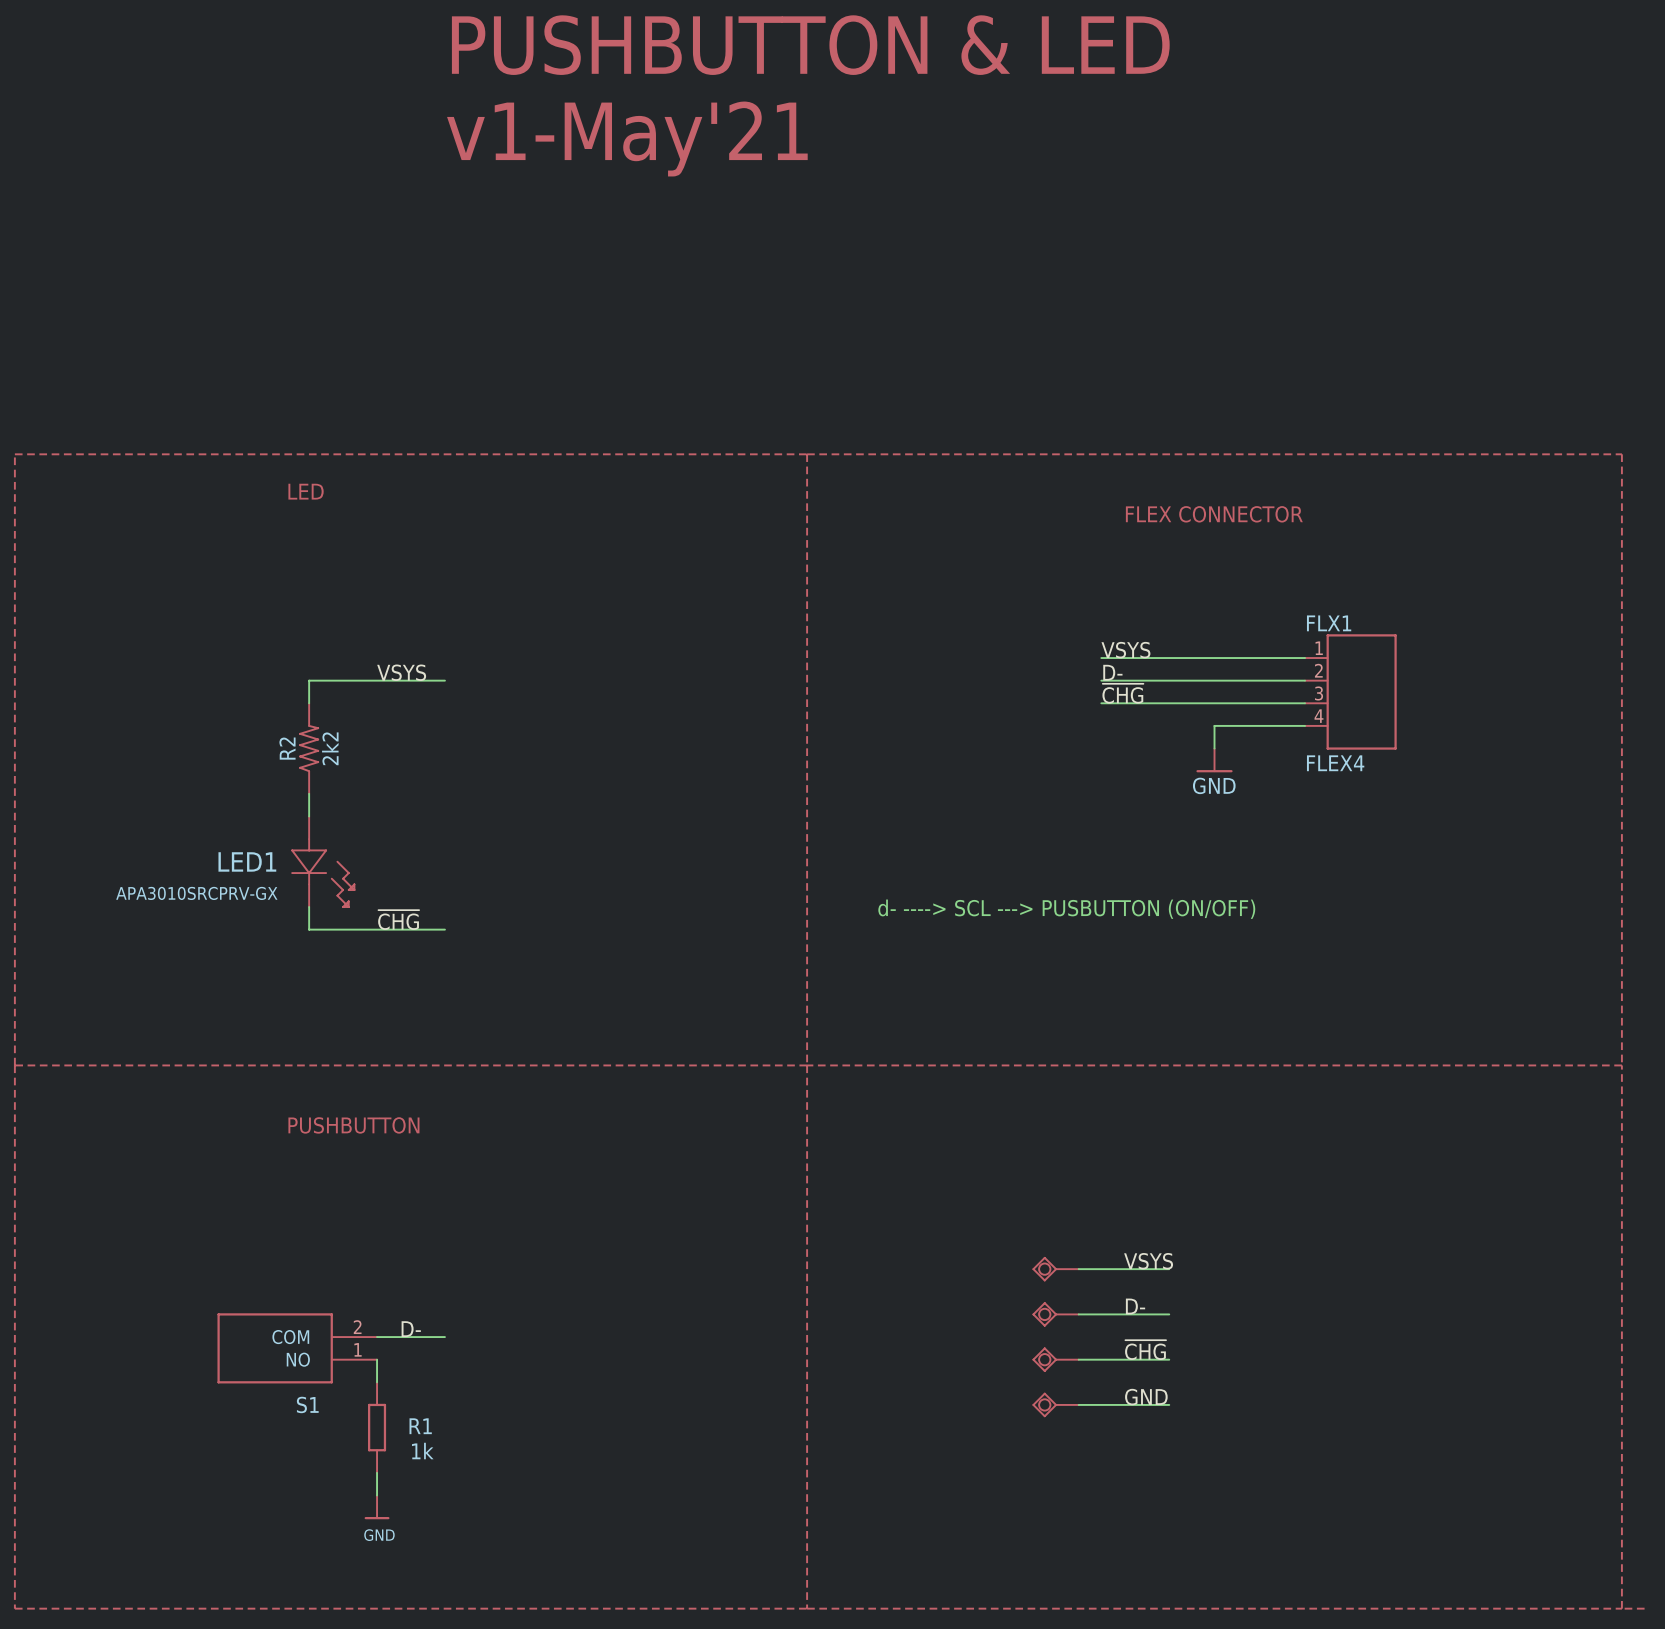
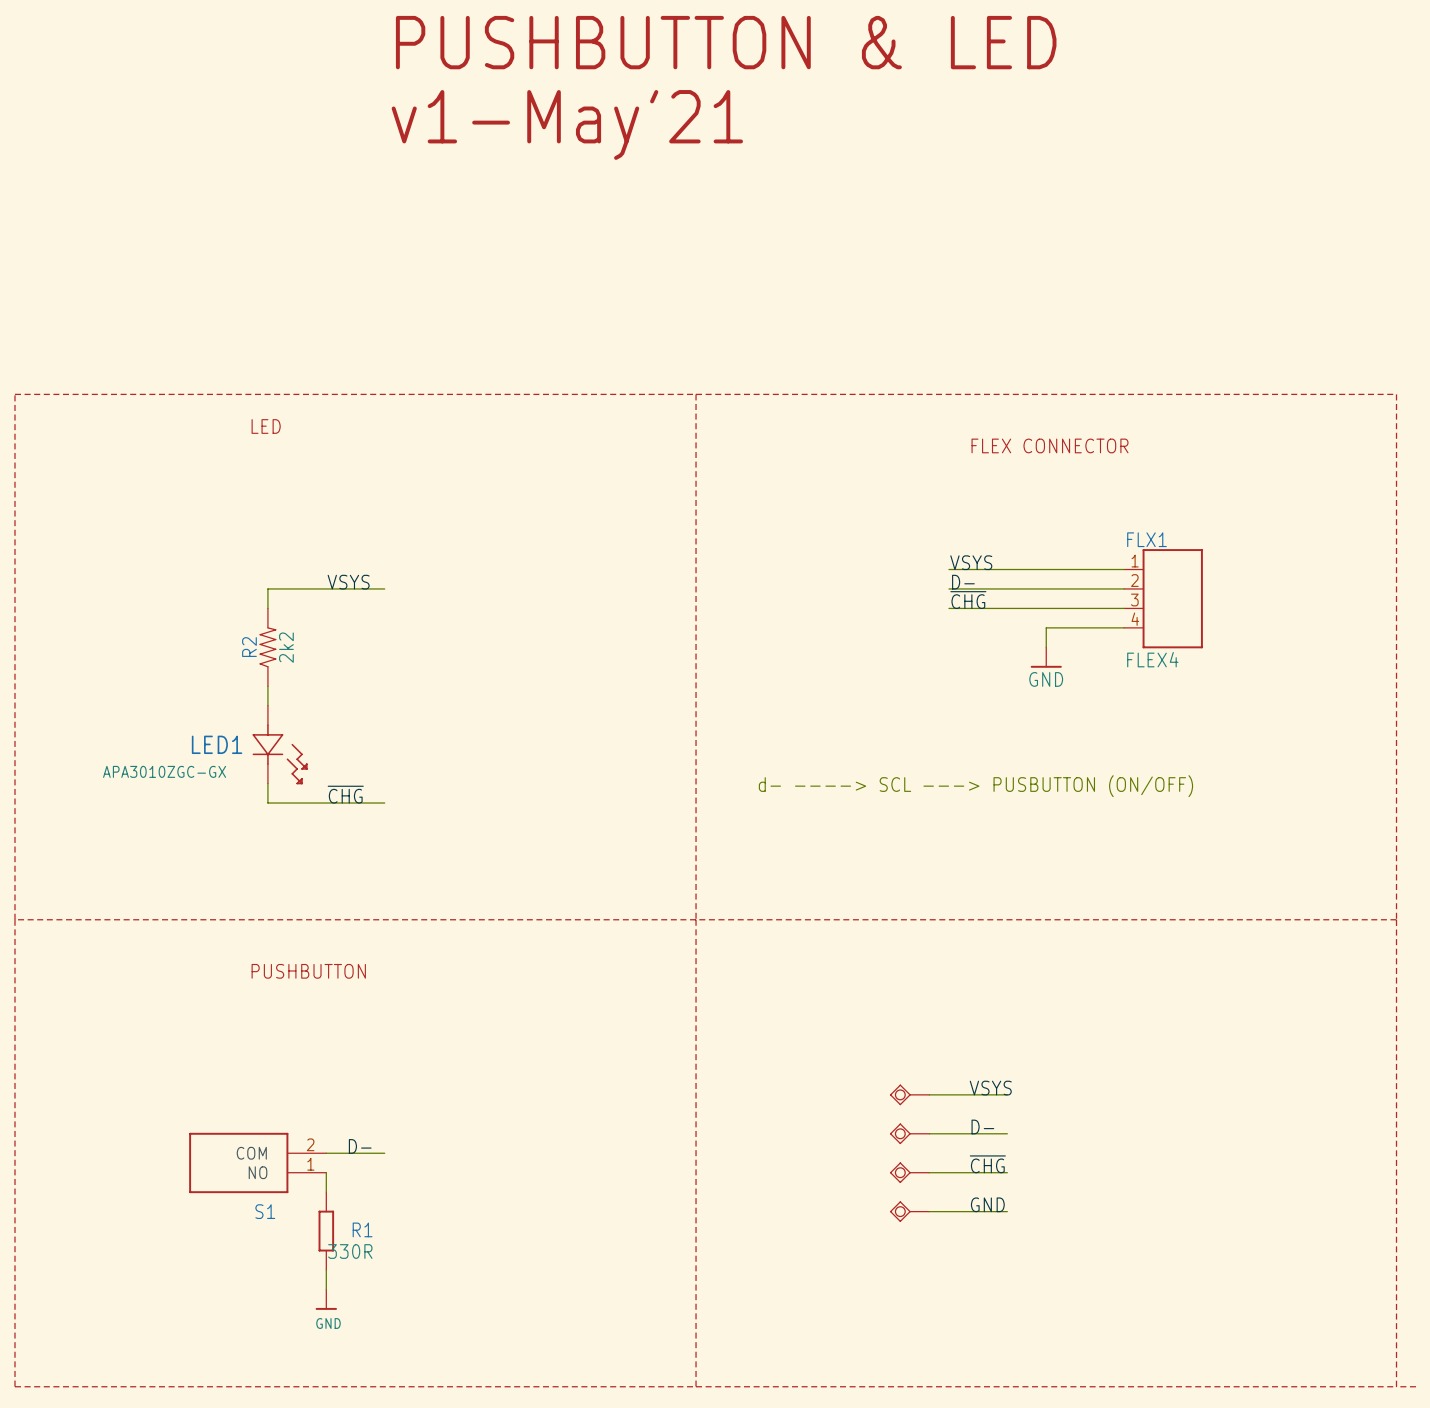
LED1 value: APA3010SRCPRV-GX (196, 893) -> APA3010ZGC-GX (164, 771)
R1 value: 1k (422, 1451) -> 330R (350, 1251)

